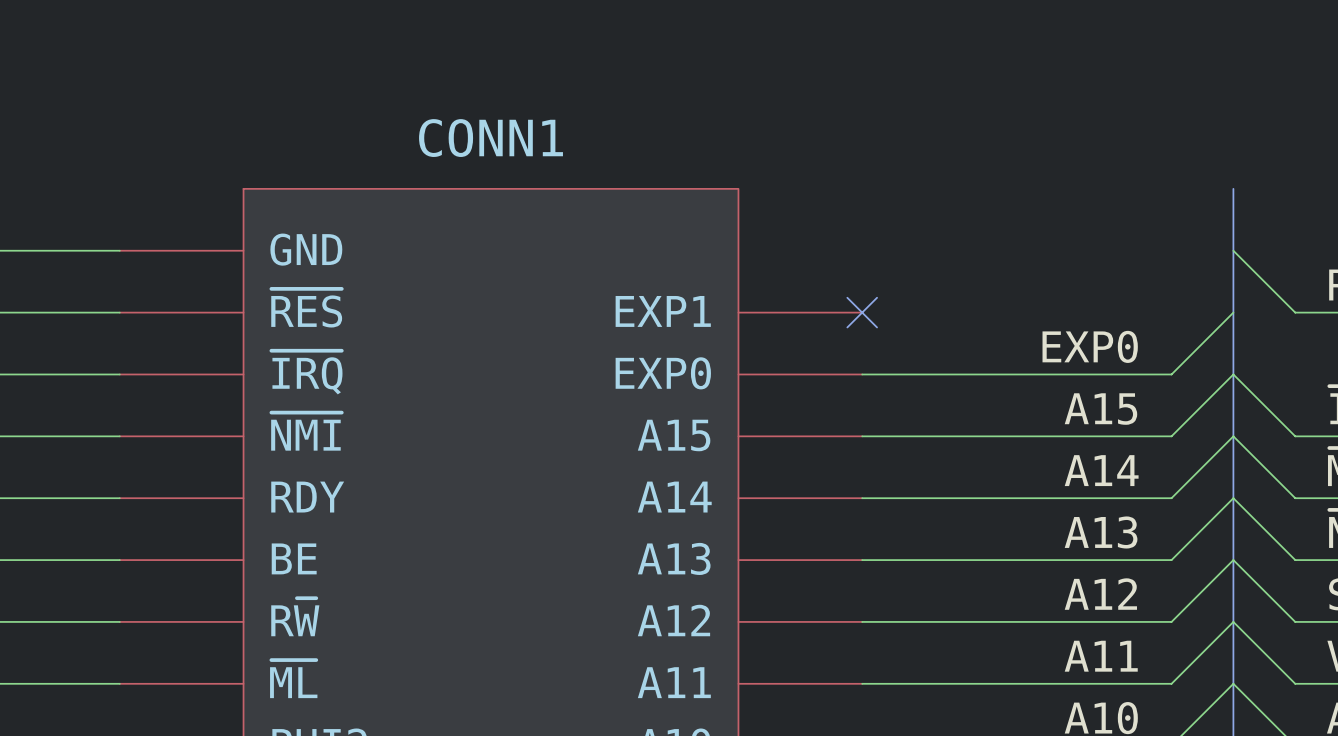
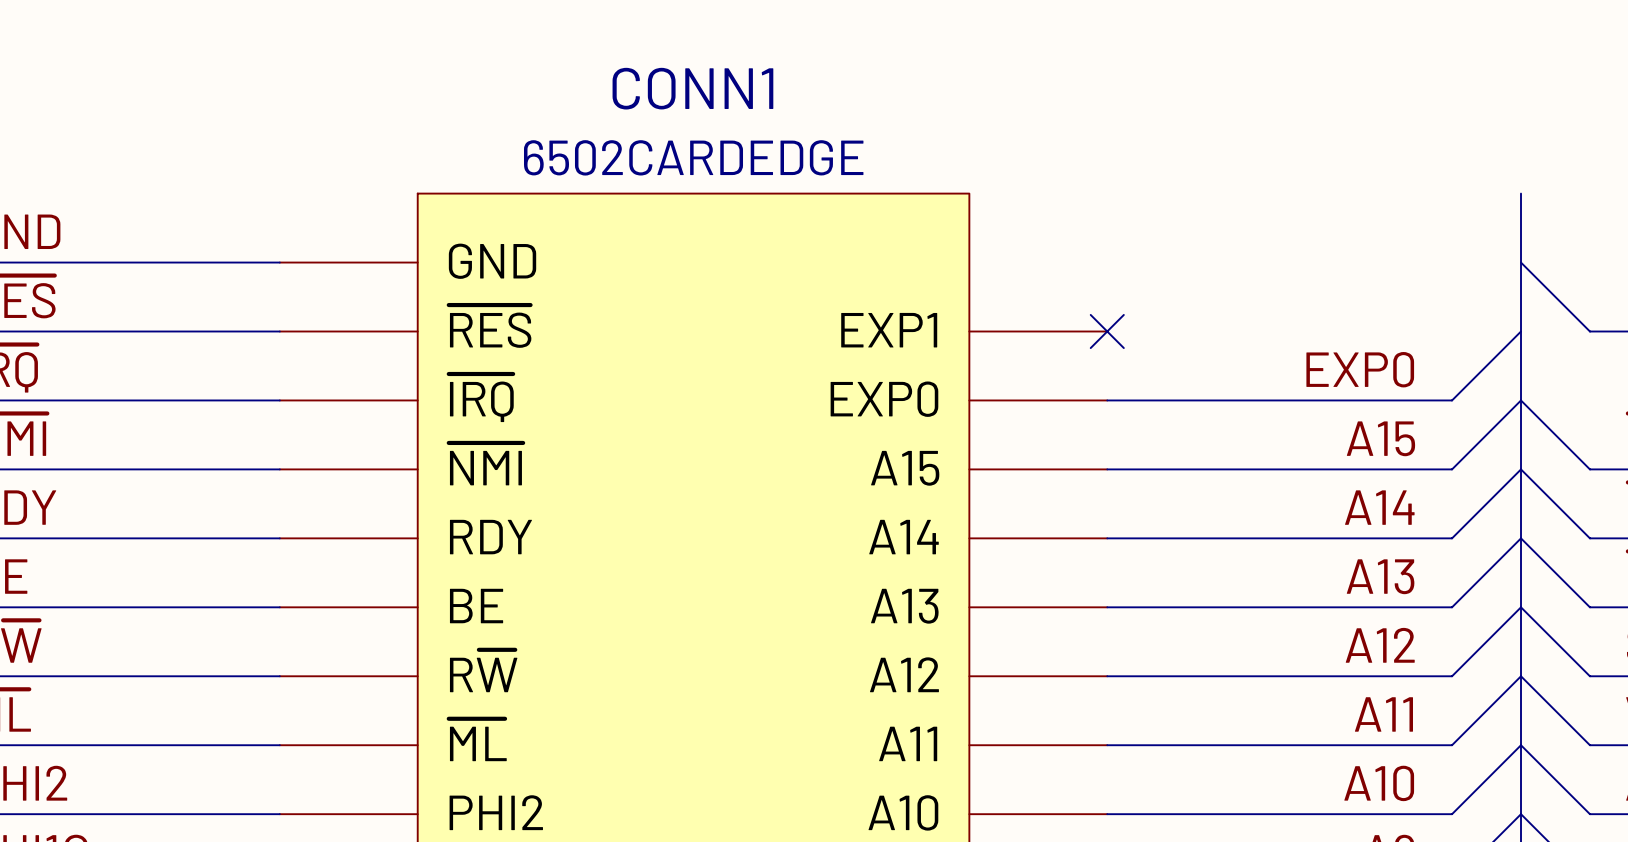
CONN1 name position: CONN1 (491, 138) -> CONN1 (692, 88)
CONN1 value: none -> 6502CARDEDGE (693, 157)

